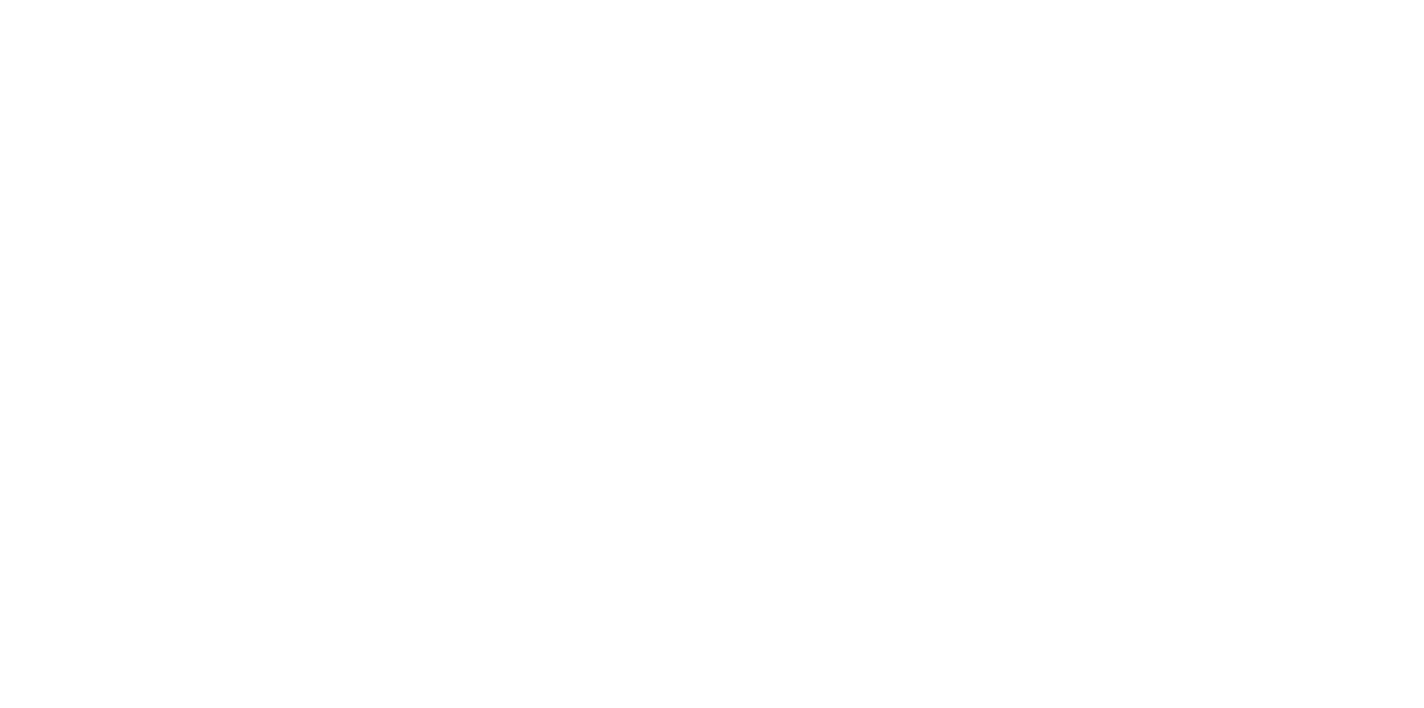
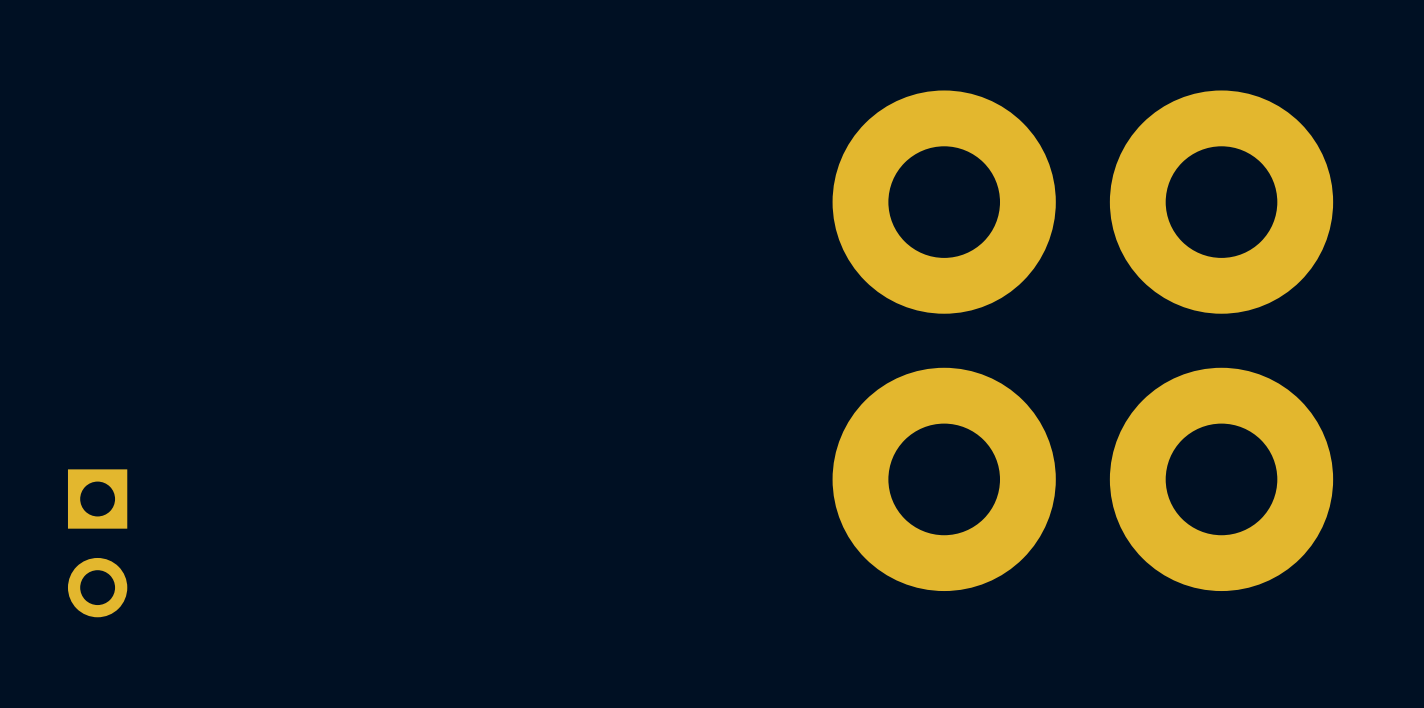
part: none -> (944, 202)
part: none -> (1221, 202)
part: none -> (944, 479)
part: none -> (1221, 479)
part: none -> (97, 543)

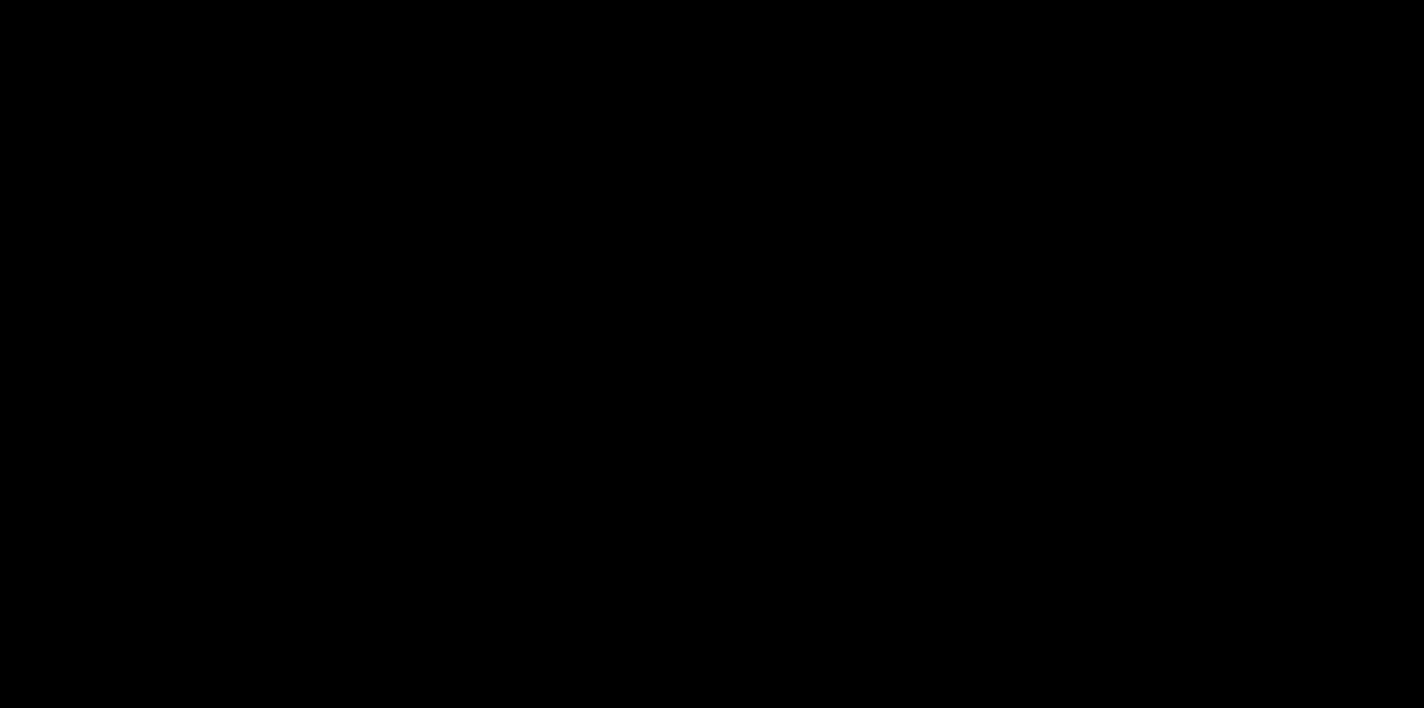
part: (944, 202) -> none
part: (1221, 202) -> none
part: (944, 479) -> none
part: (1221, 479) -> none
part: (97, 543) -> none

